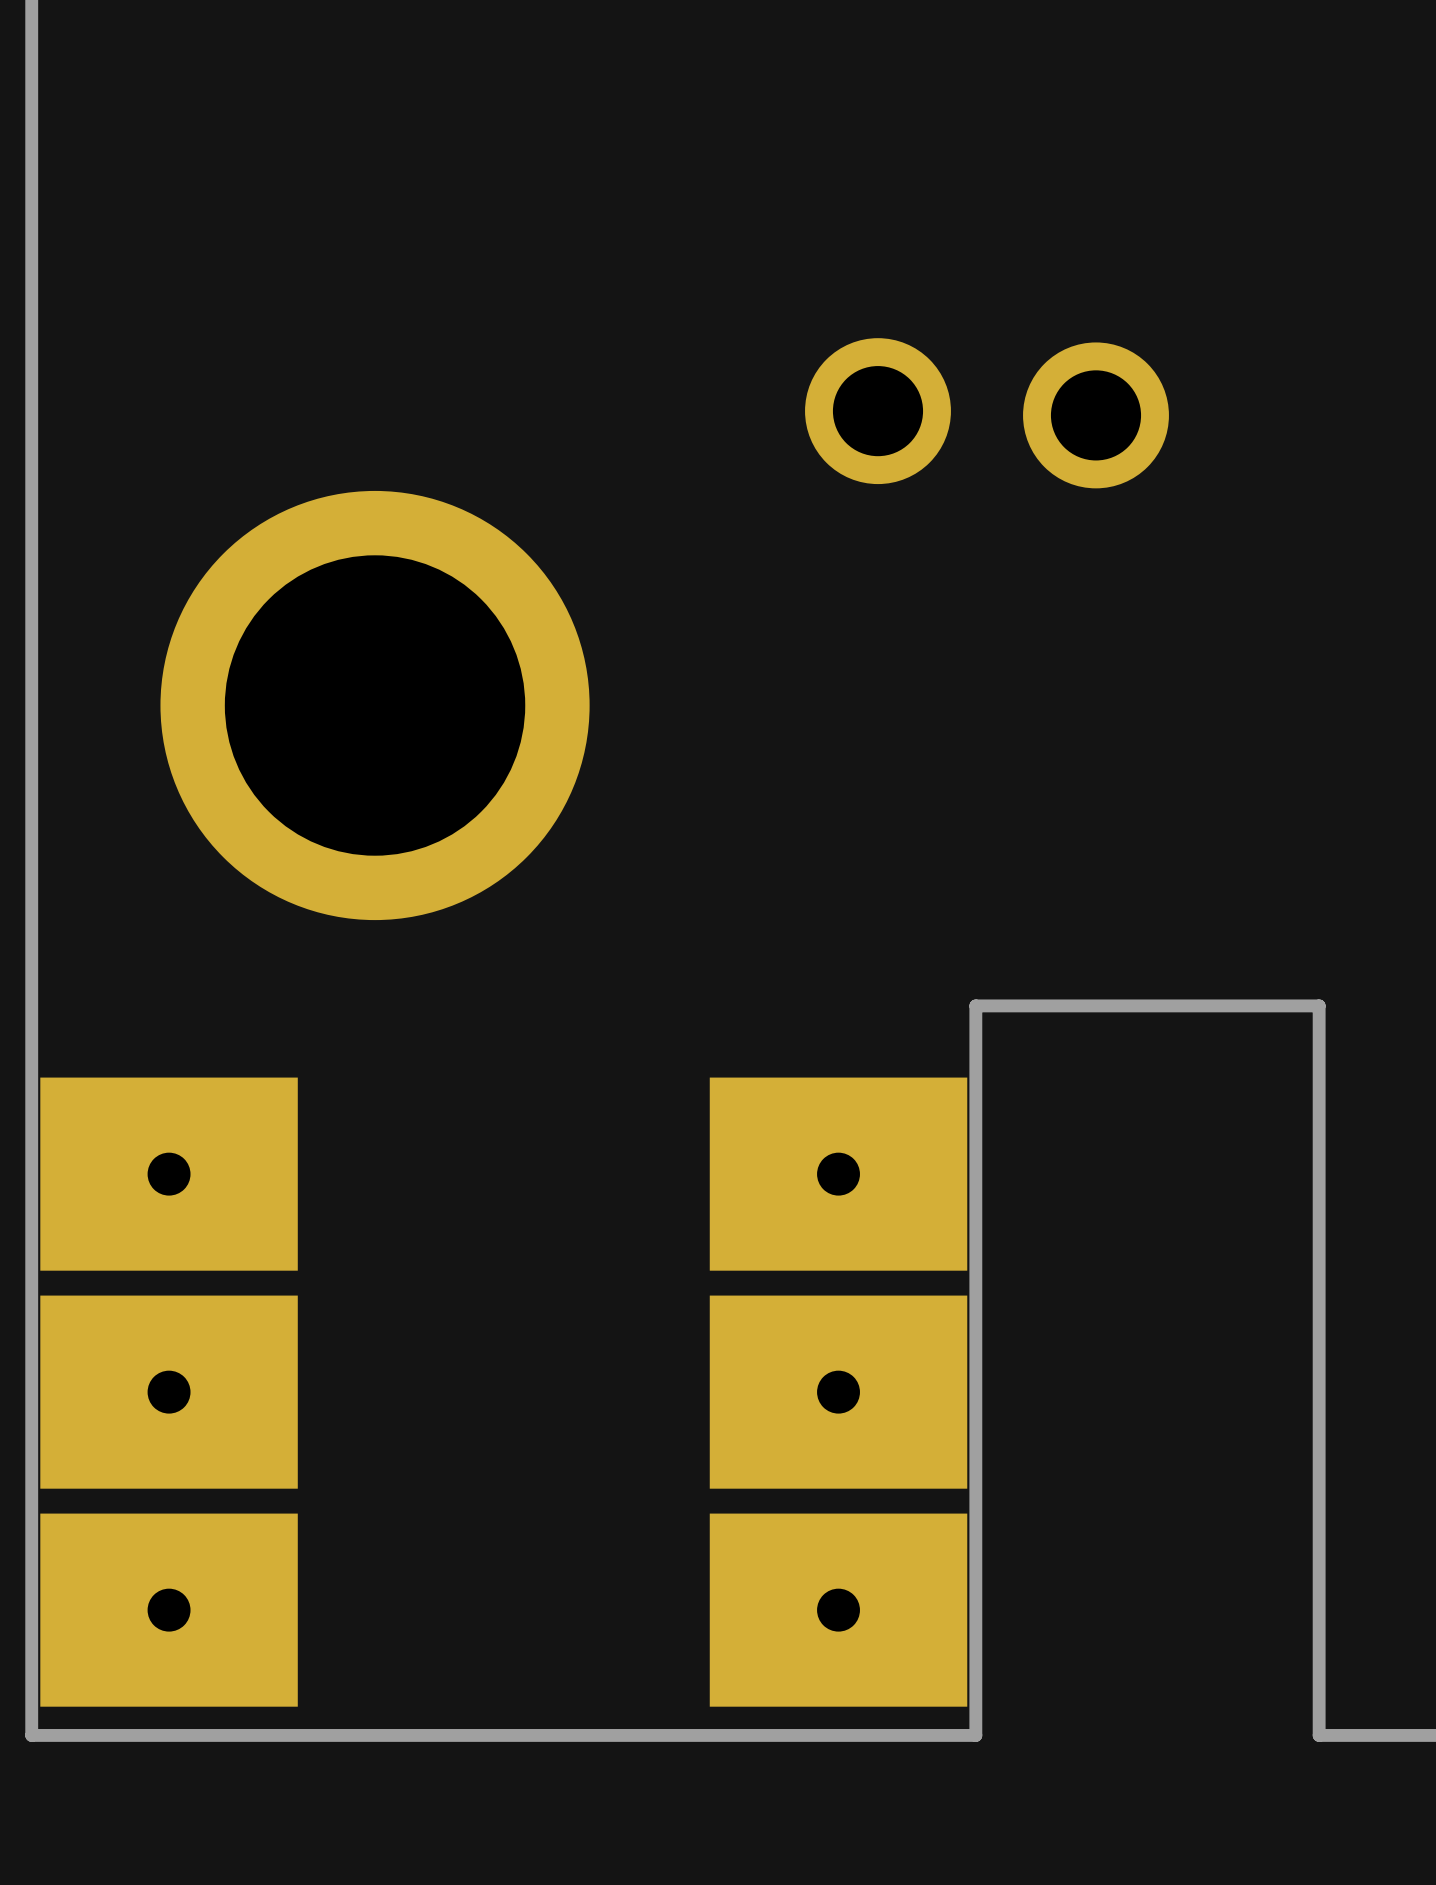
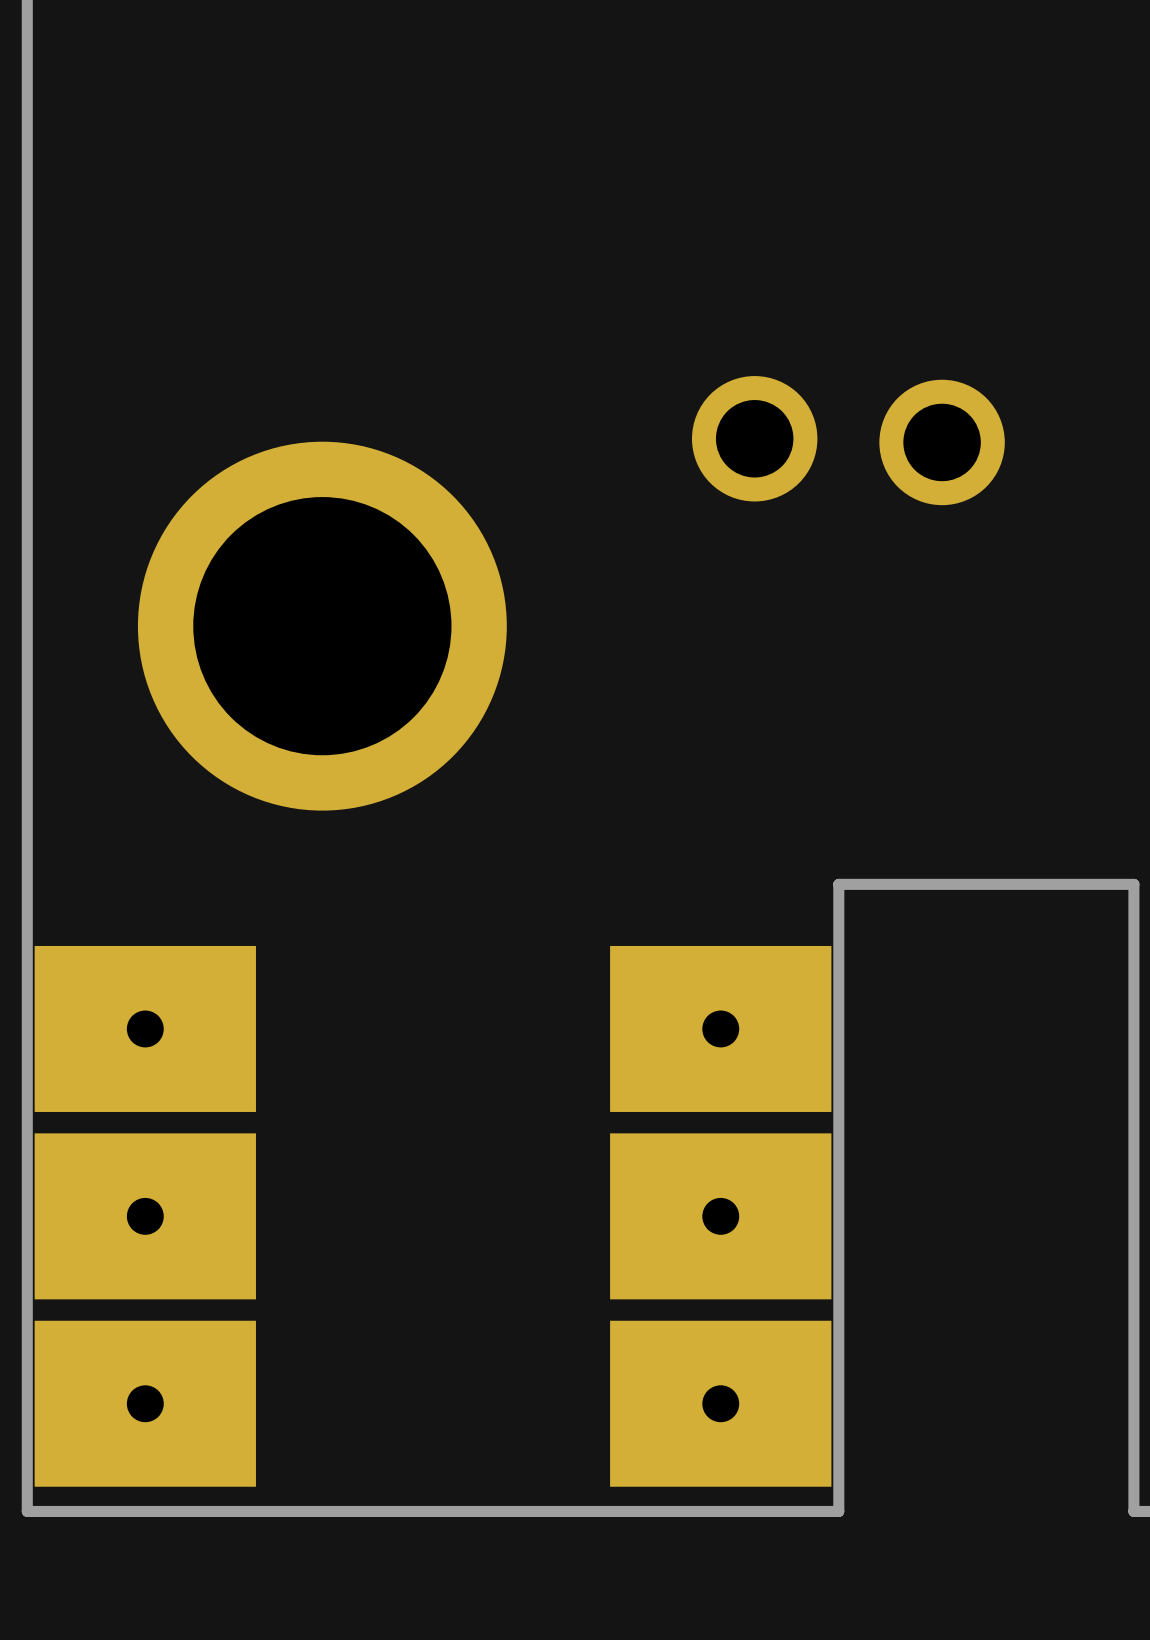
part position: (986, 413) -> (848, 440)

